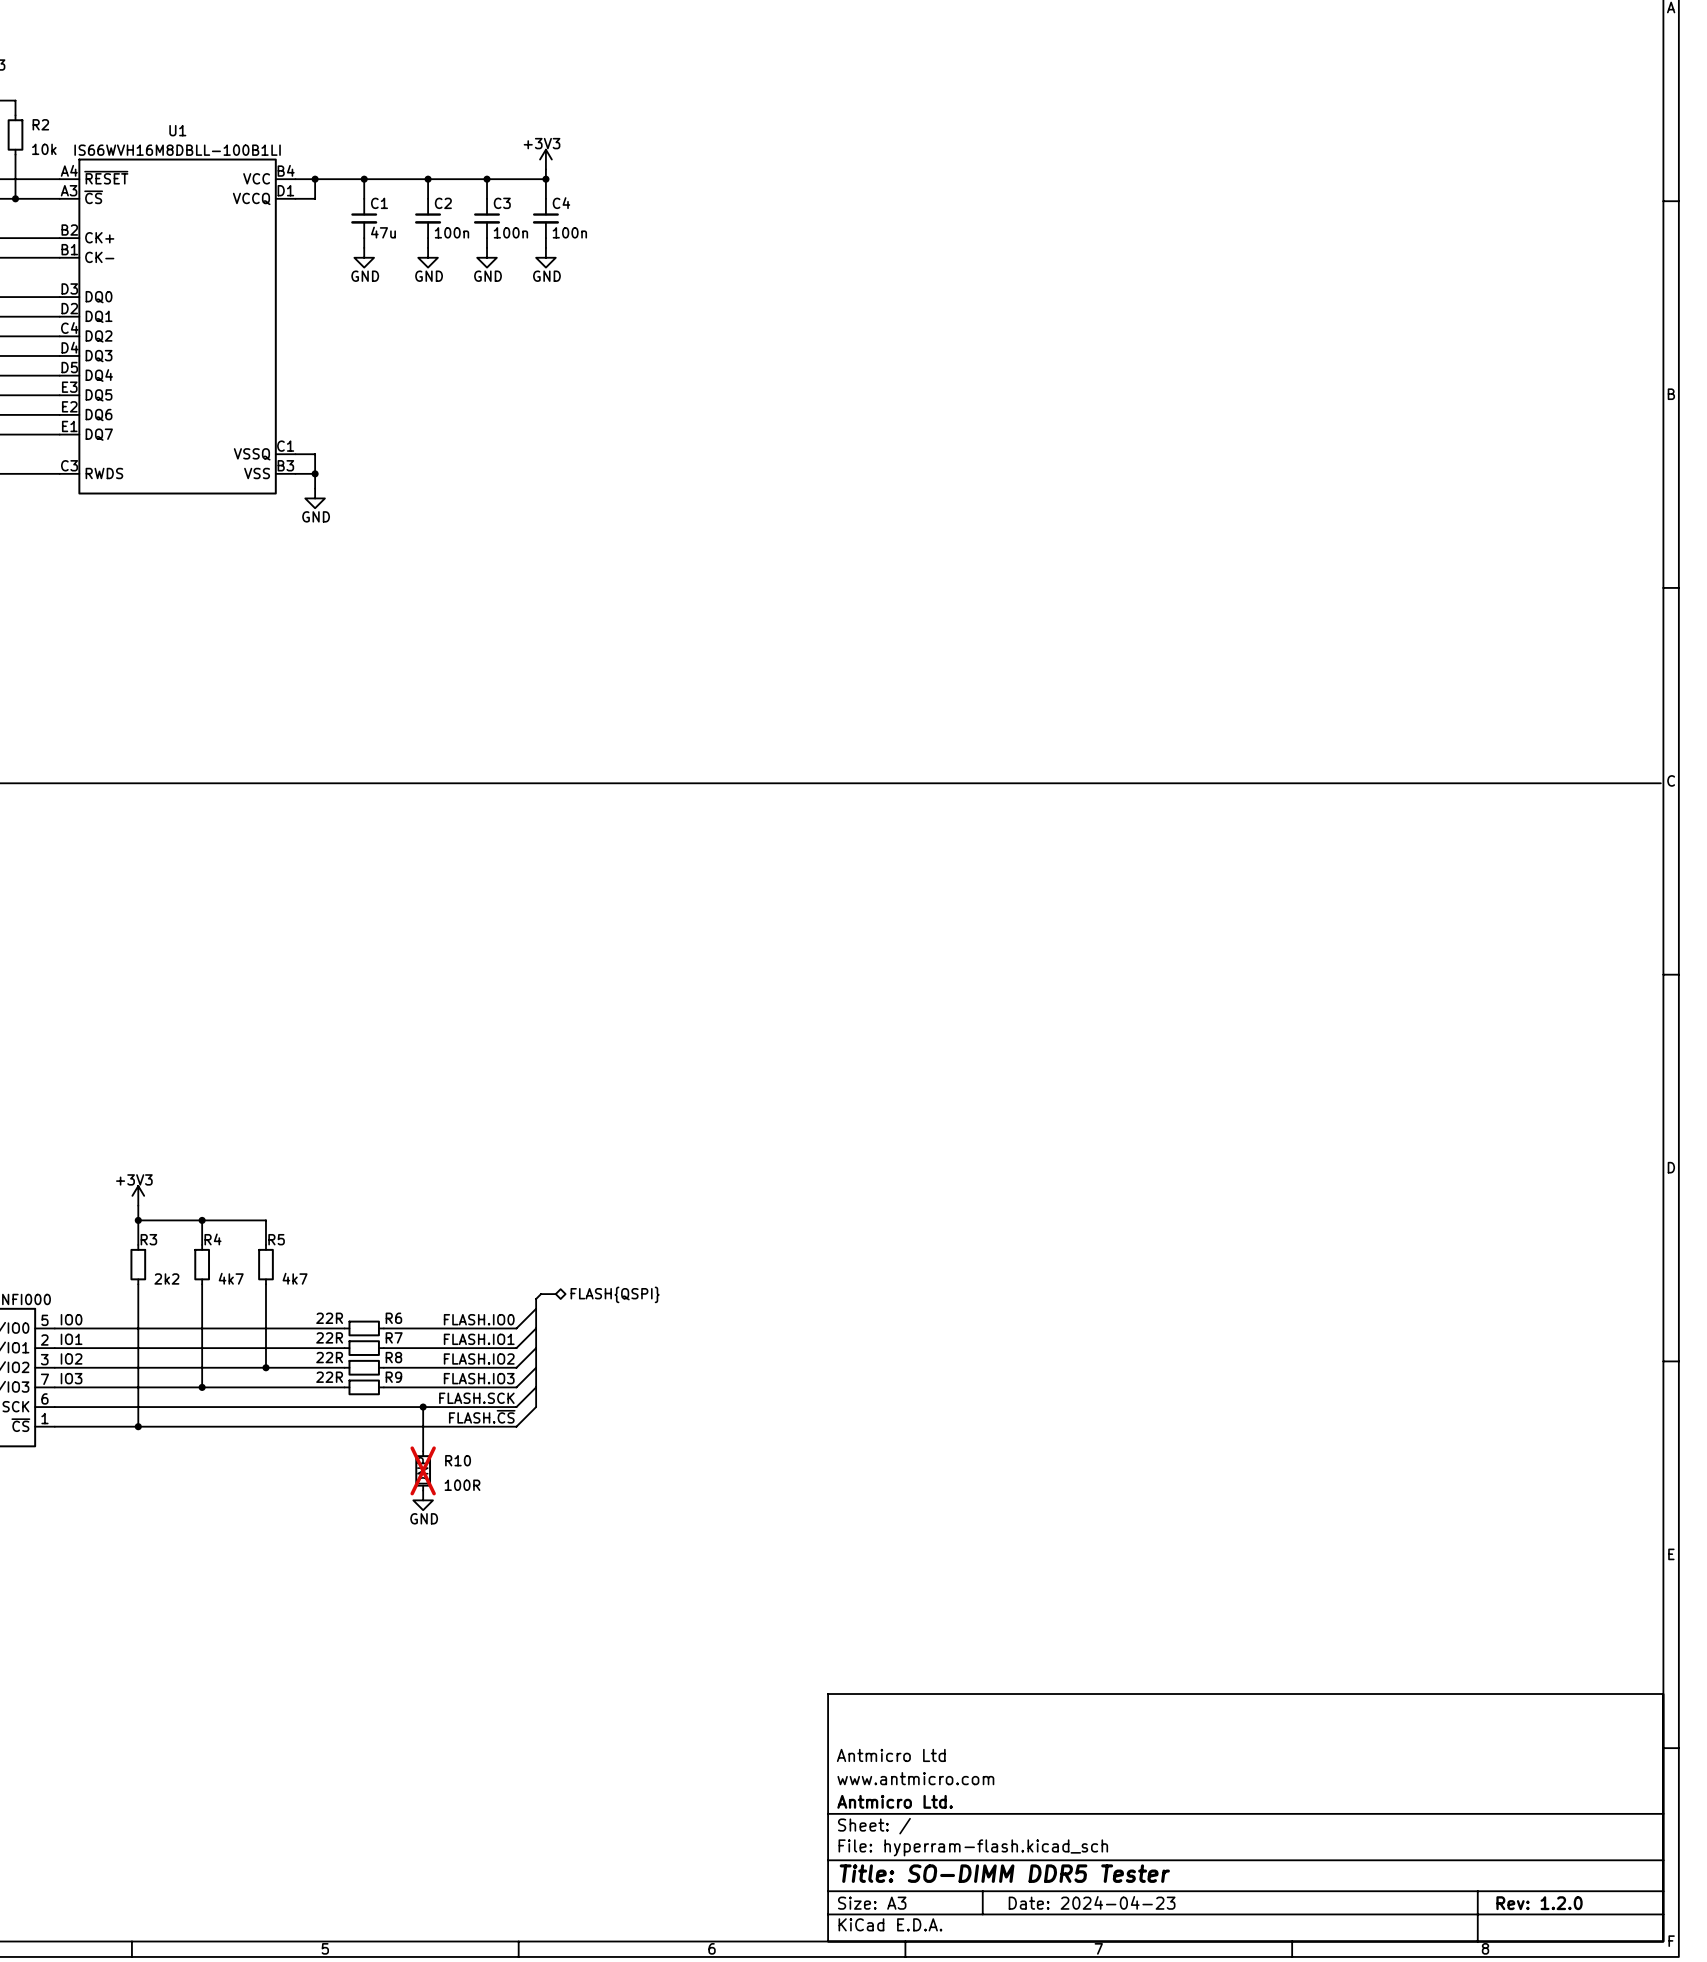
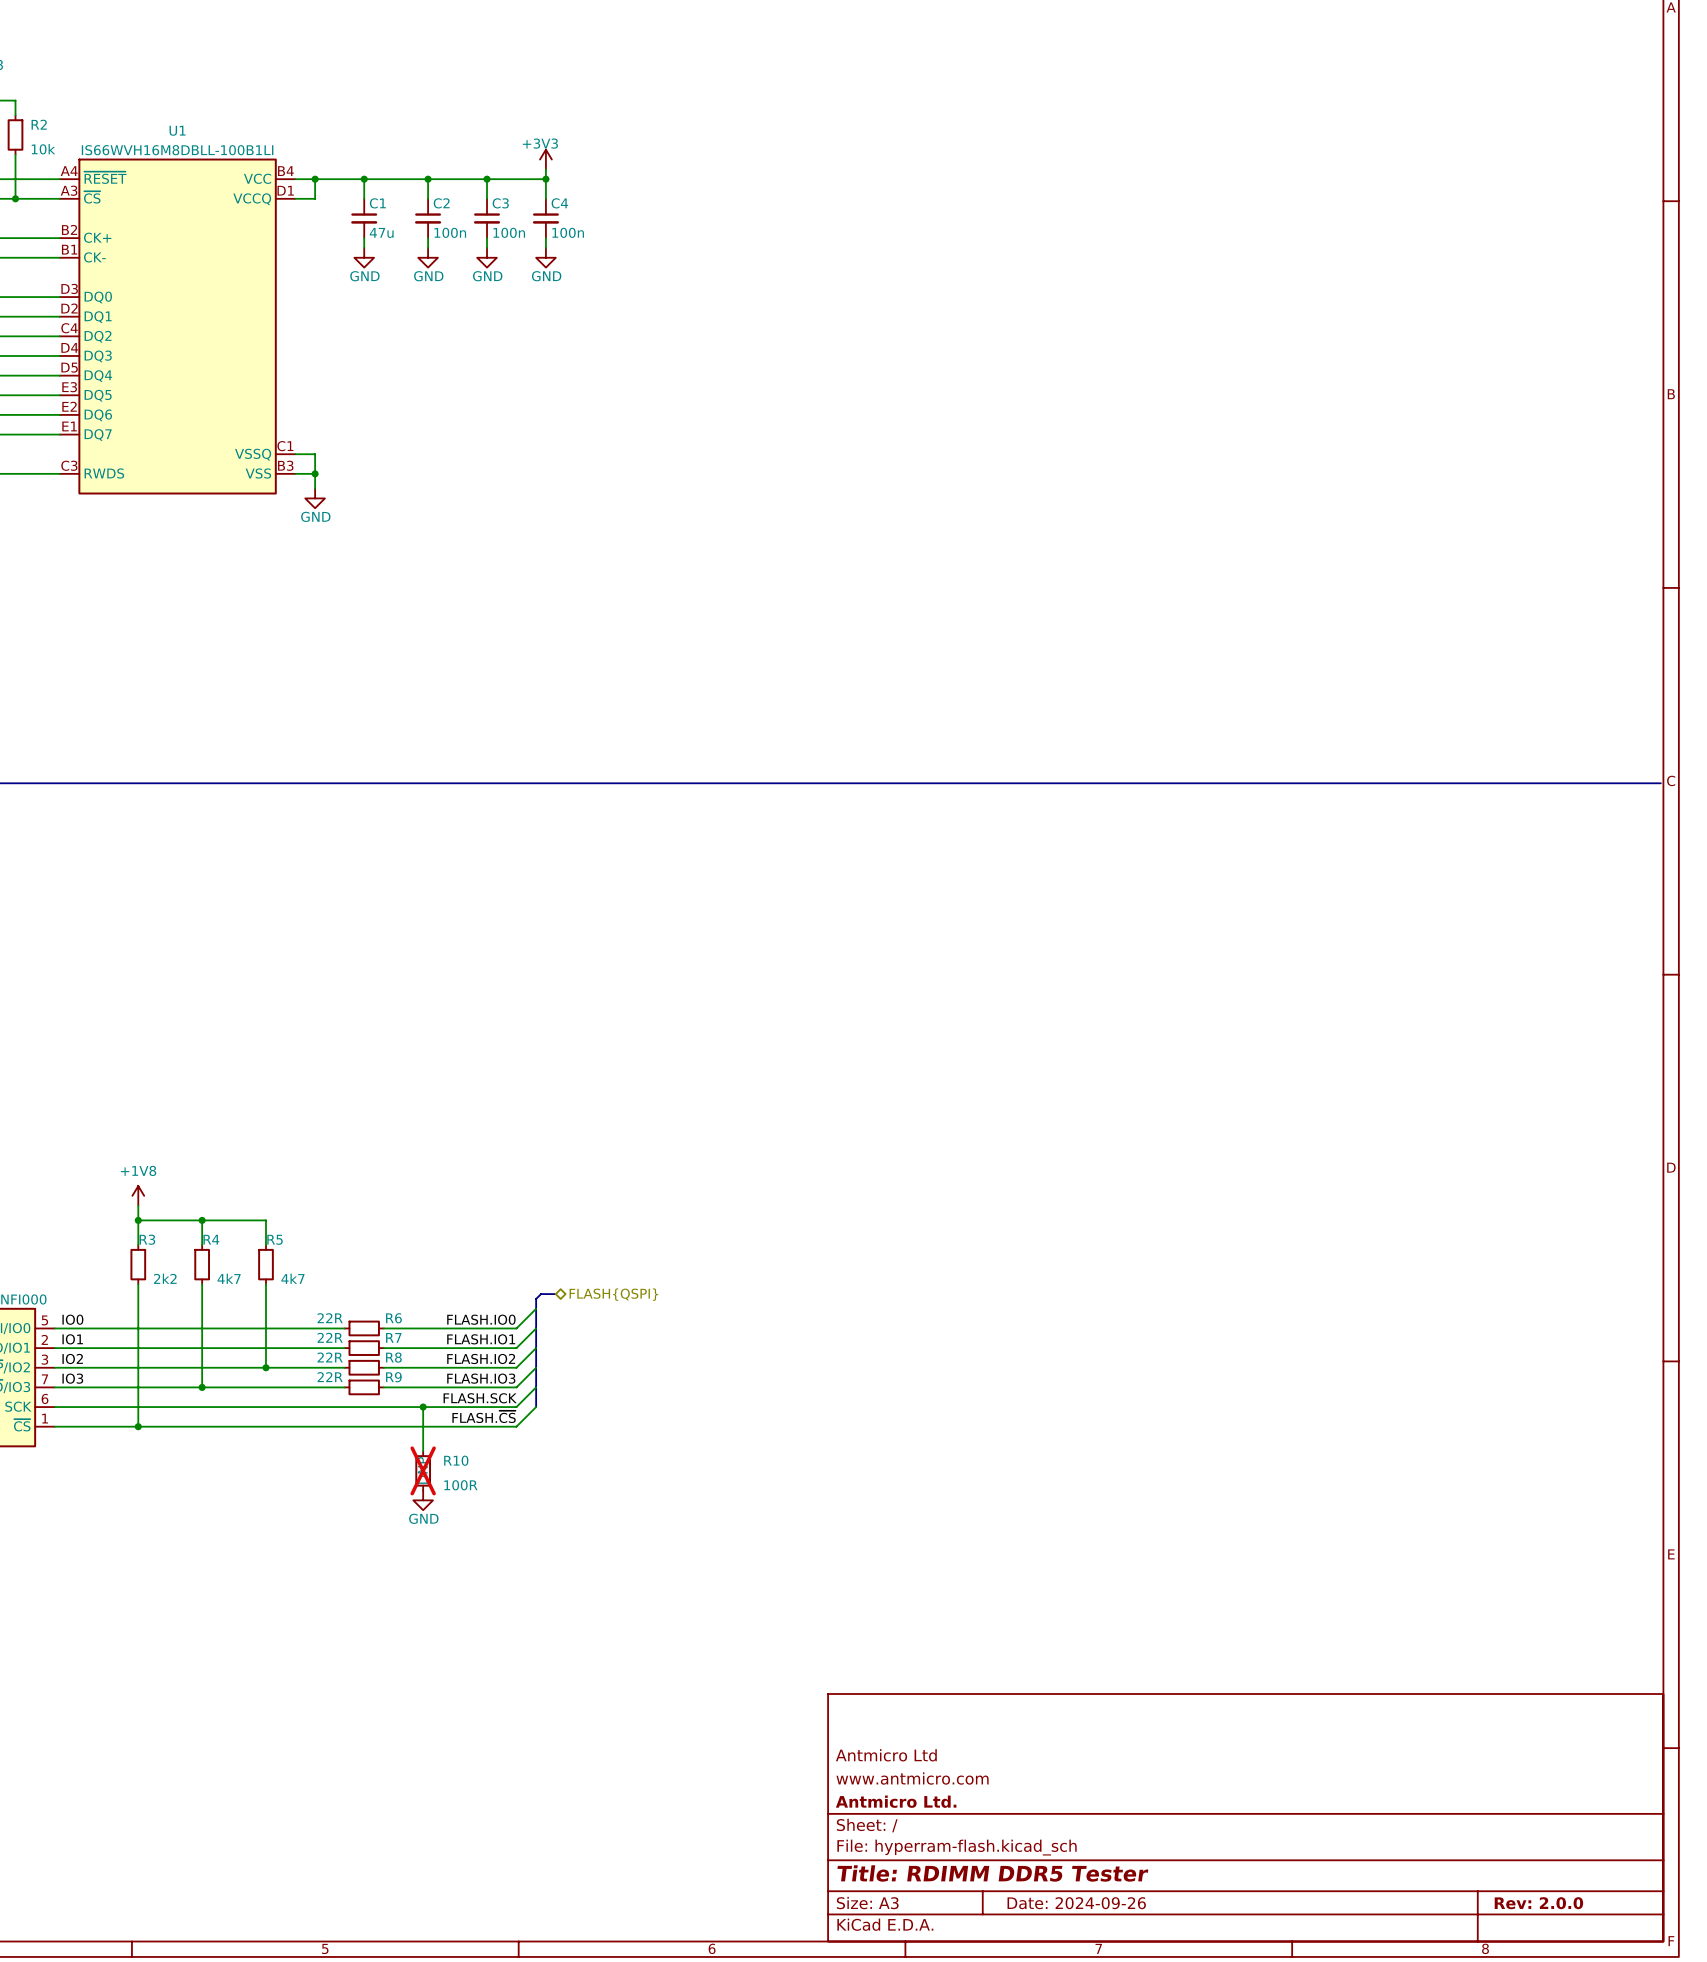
power symbol: +3V3 (138, 1195) -> +1V8 (138, 1195)
title block: Title: SO-DIMM DDR5 Tester (1004, 1873) -> Title: RDIMM DDR5 Tester (992, 1873)
title block: Date: 2024-04-23 (1092, 1902) -> Date: 2024-09-26 (1076, 1903)
title block: Rev: 1.2.0 (1539, 1903) -> Rev: 2.0.0 (1538, 1903)

